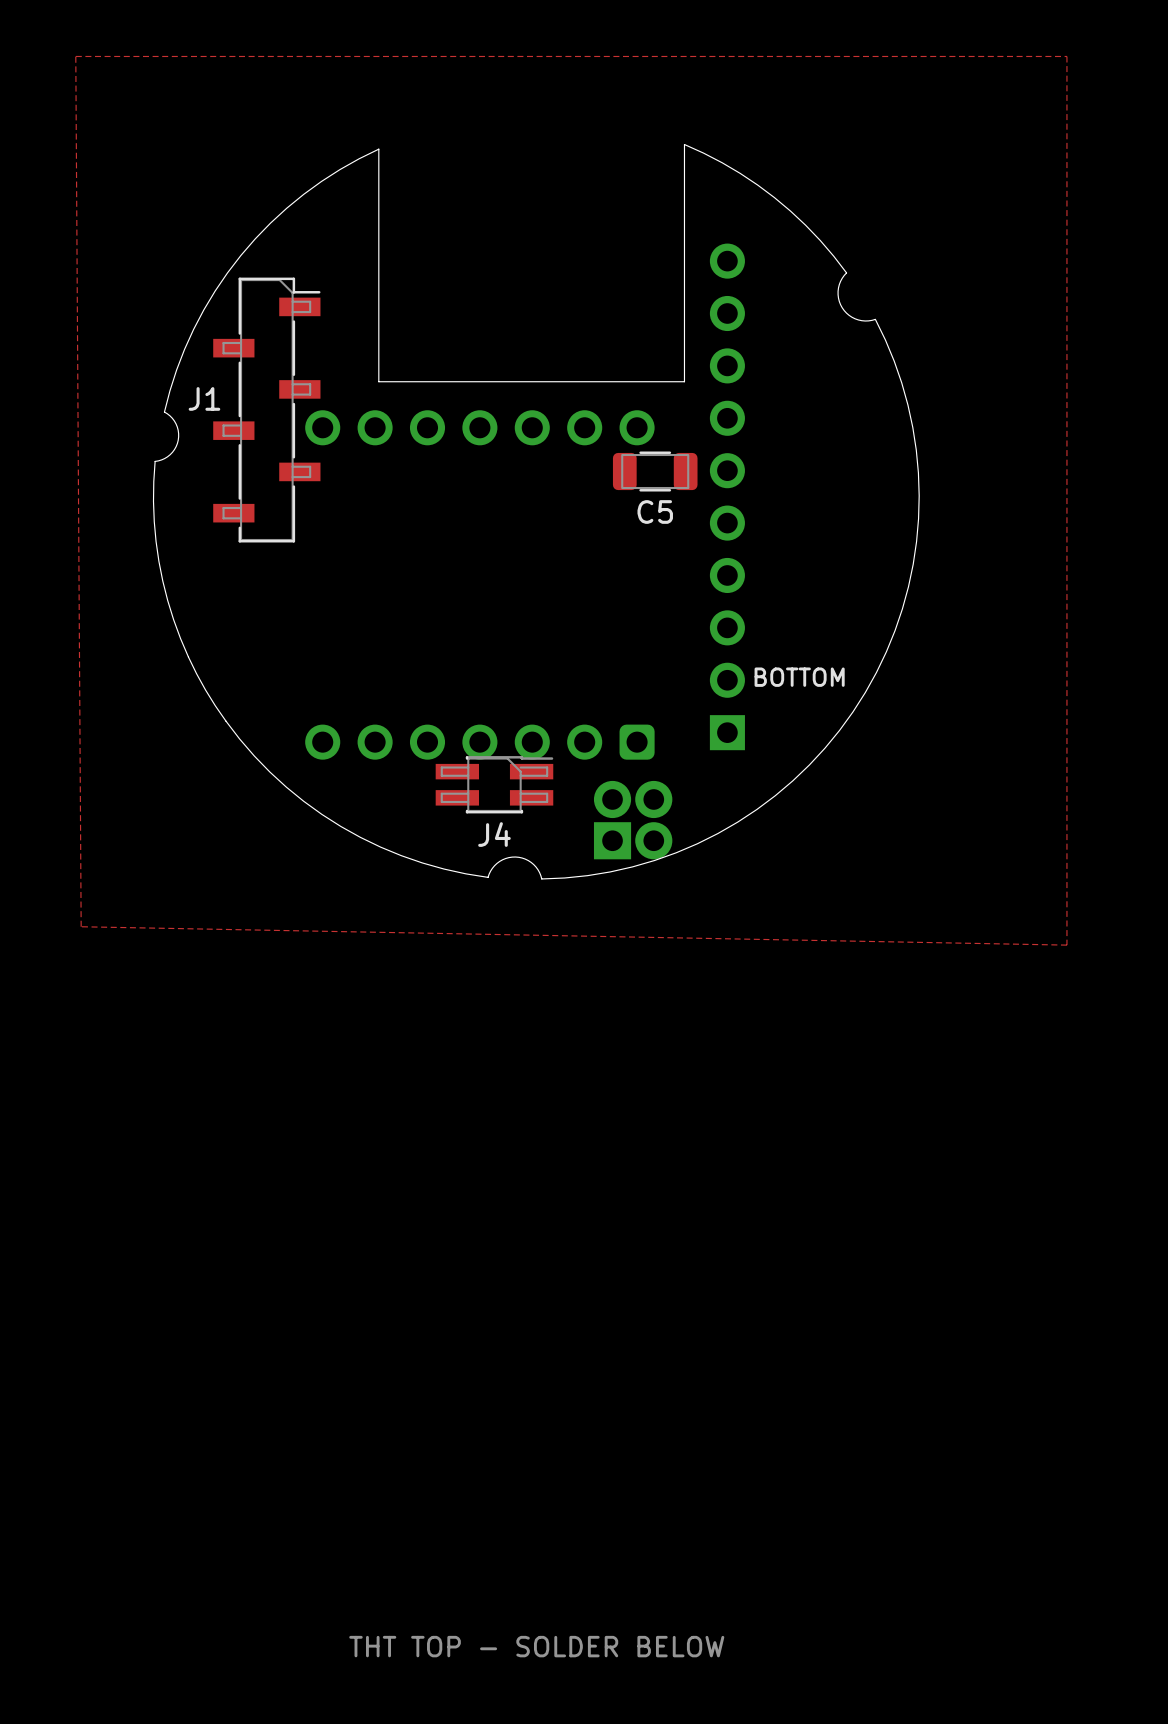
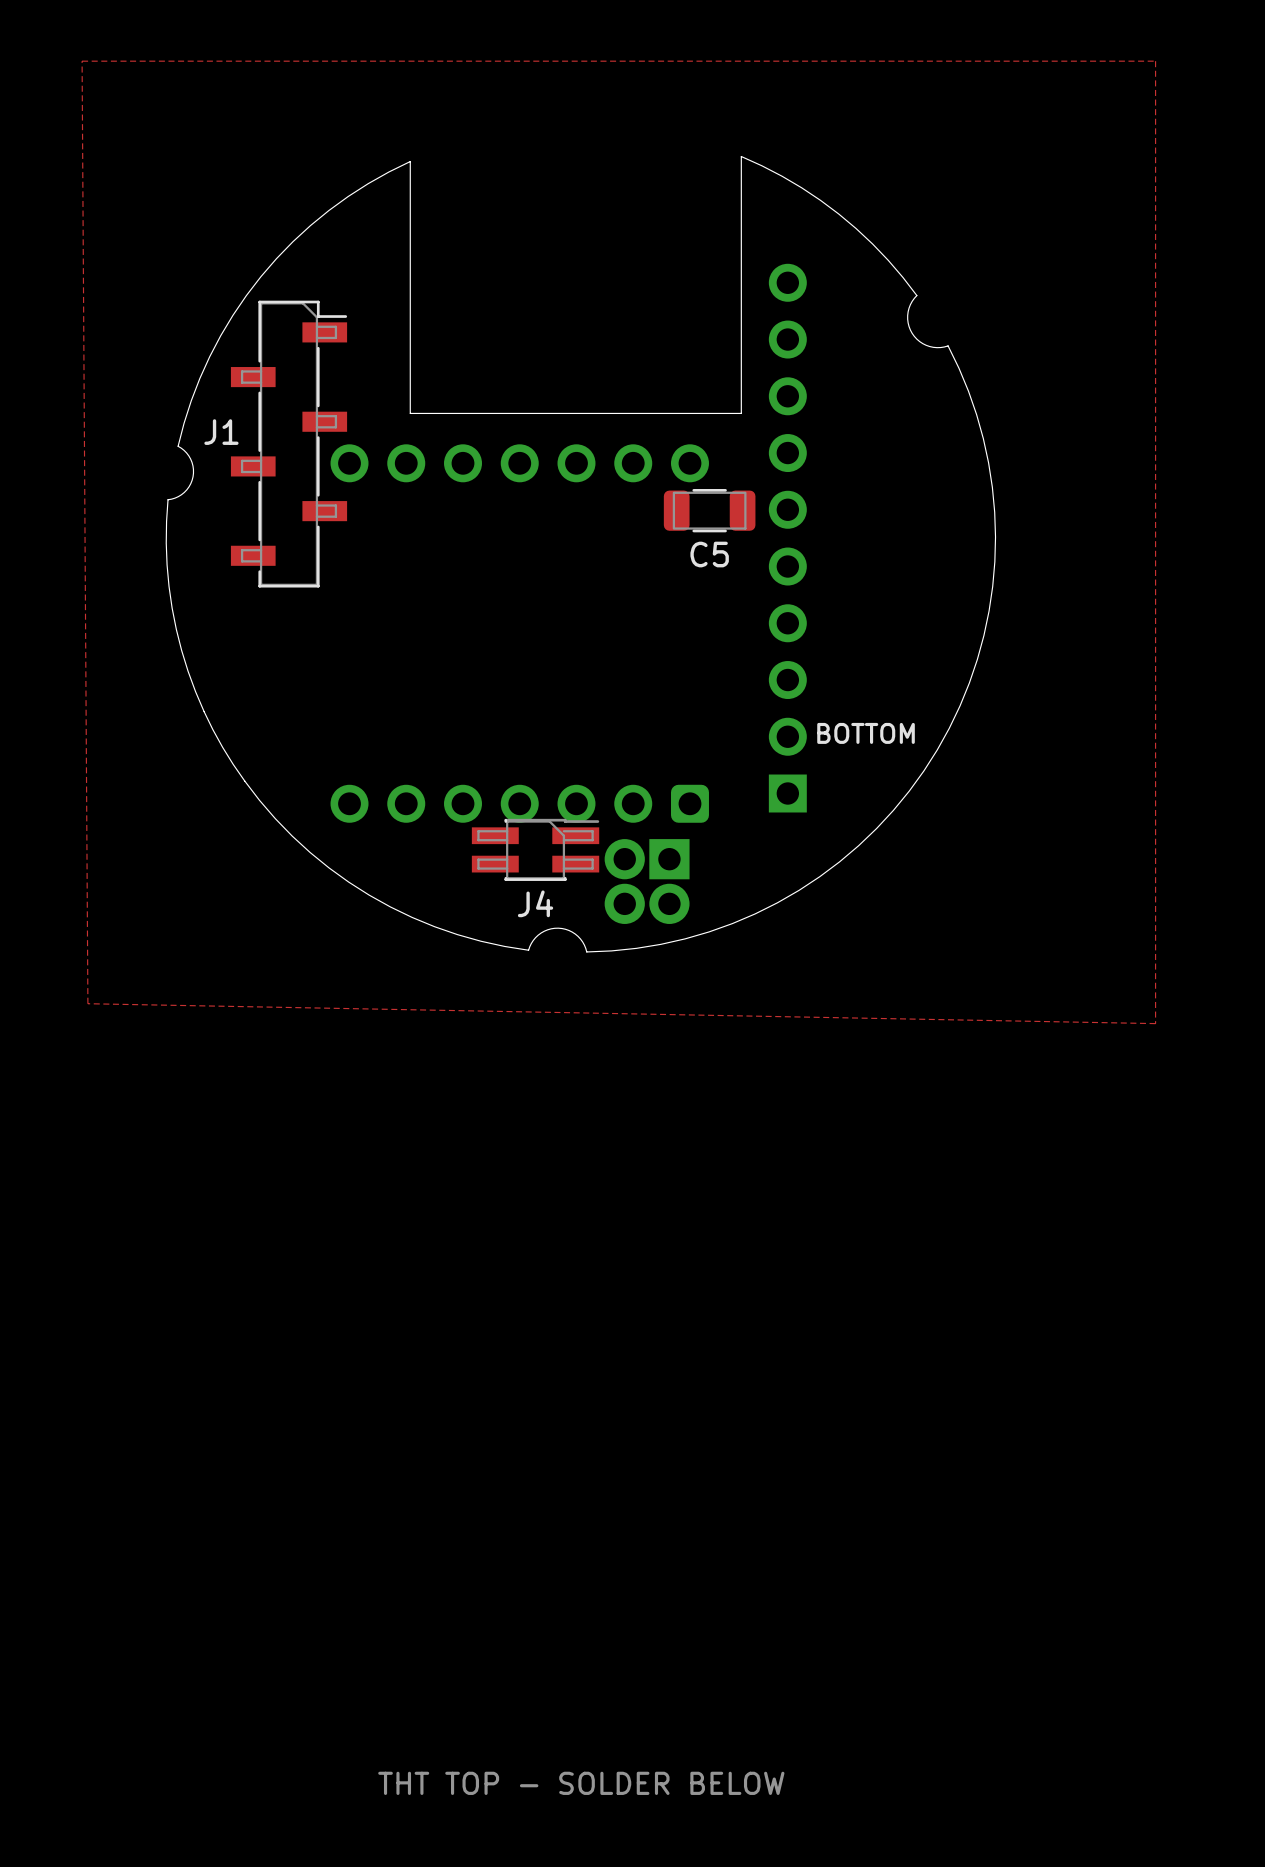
part rotation: 0° (633, 820) -> 180° (647, 881)

